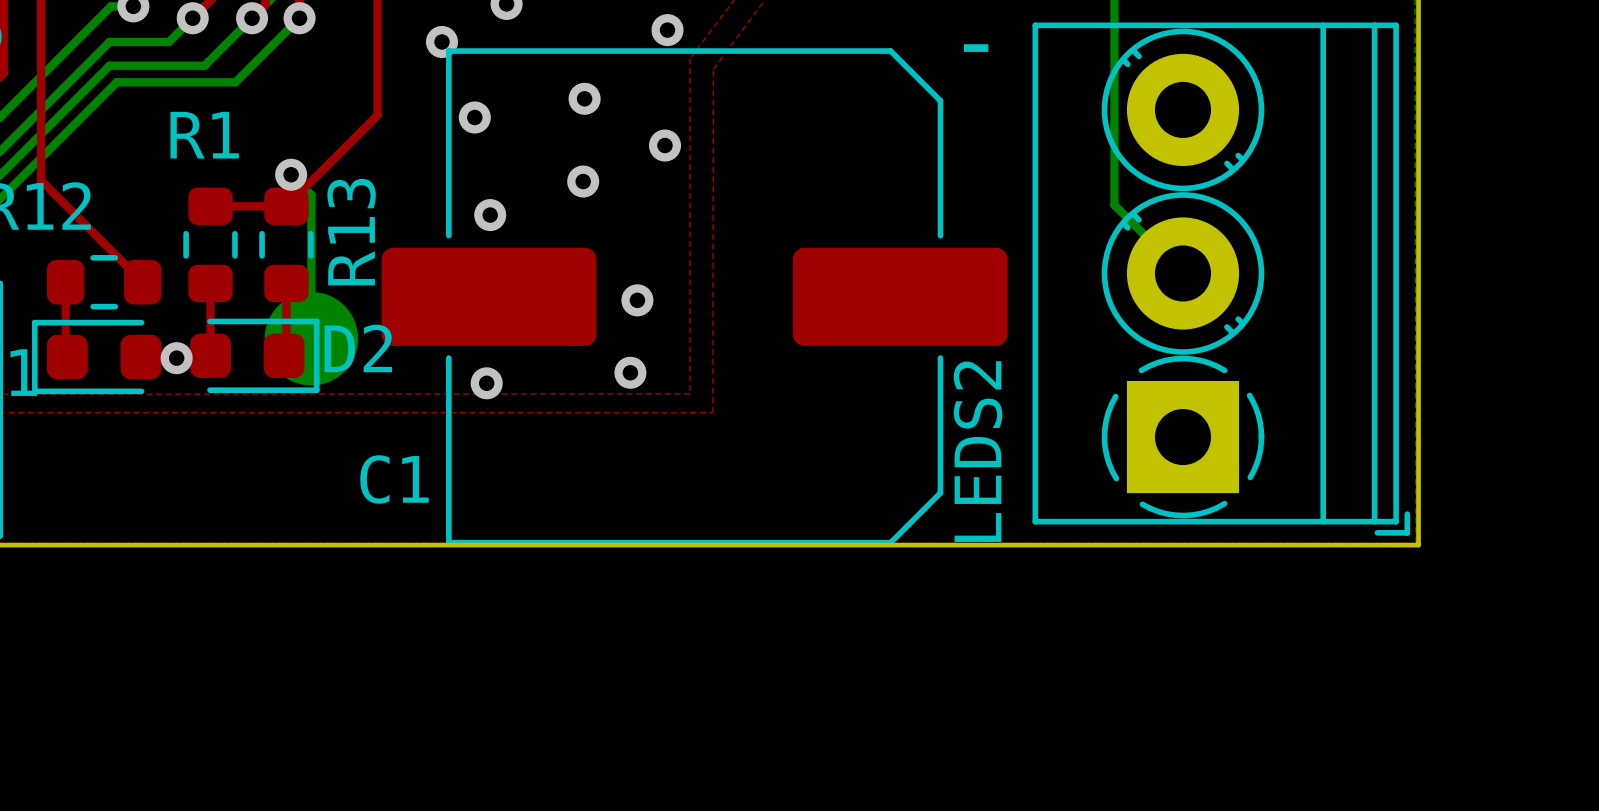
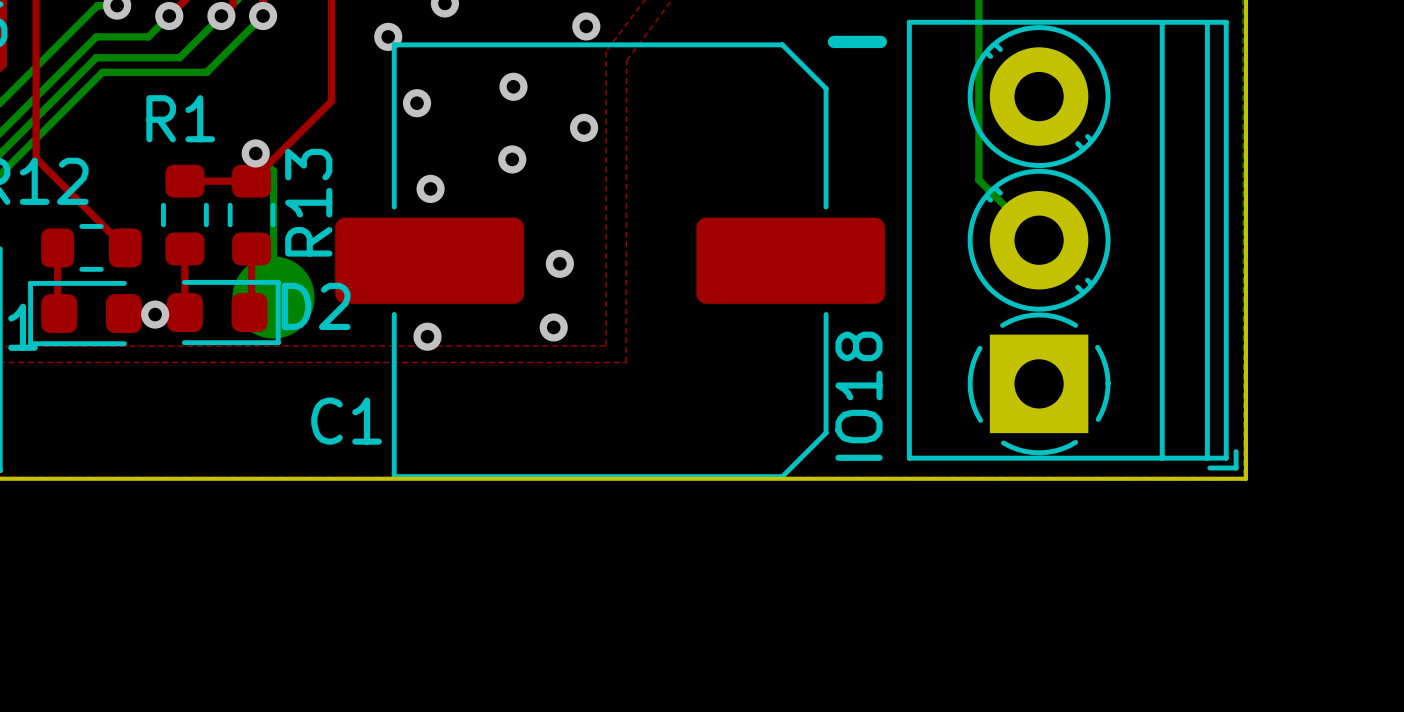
LEDS2 name: LEDS2 (978, 451) -> IO18 (859, 396)

